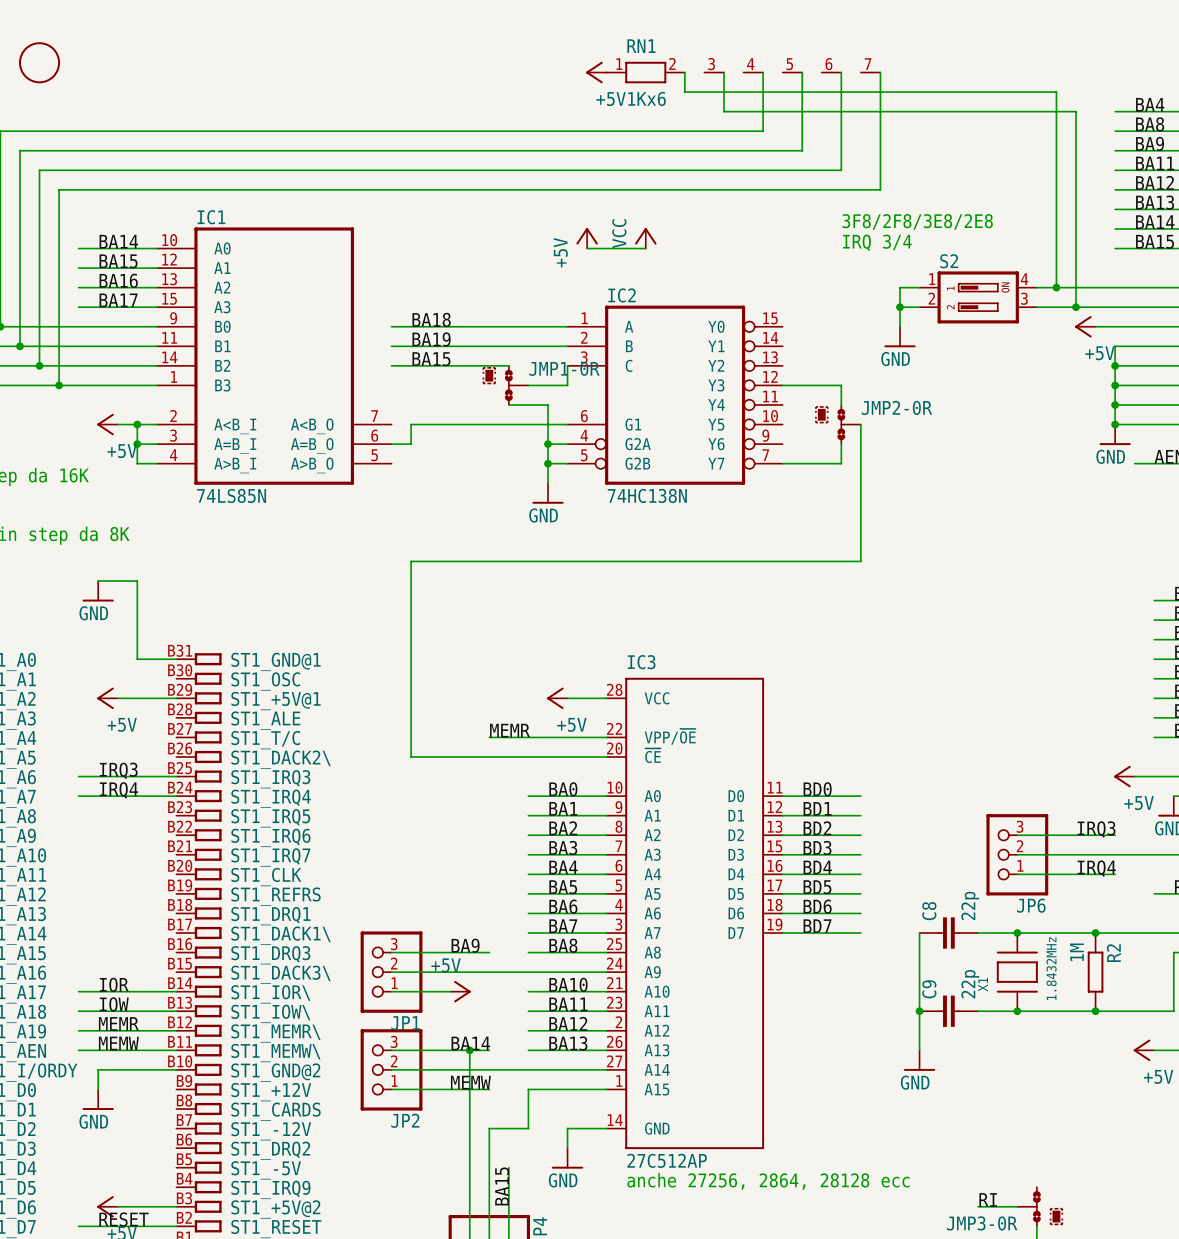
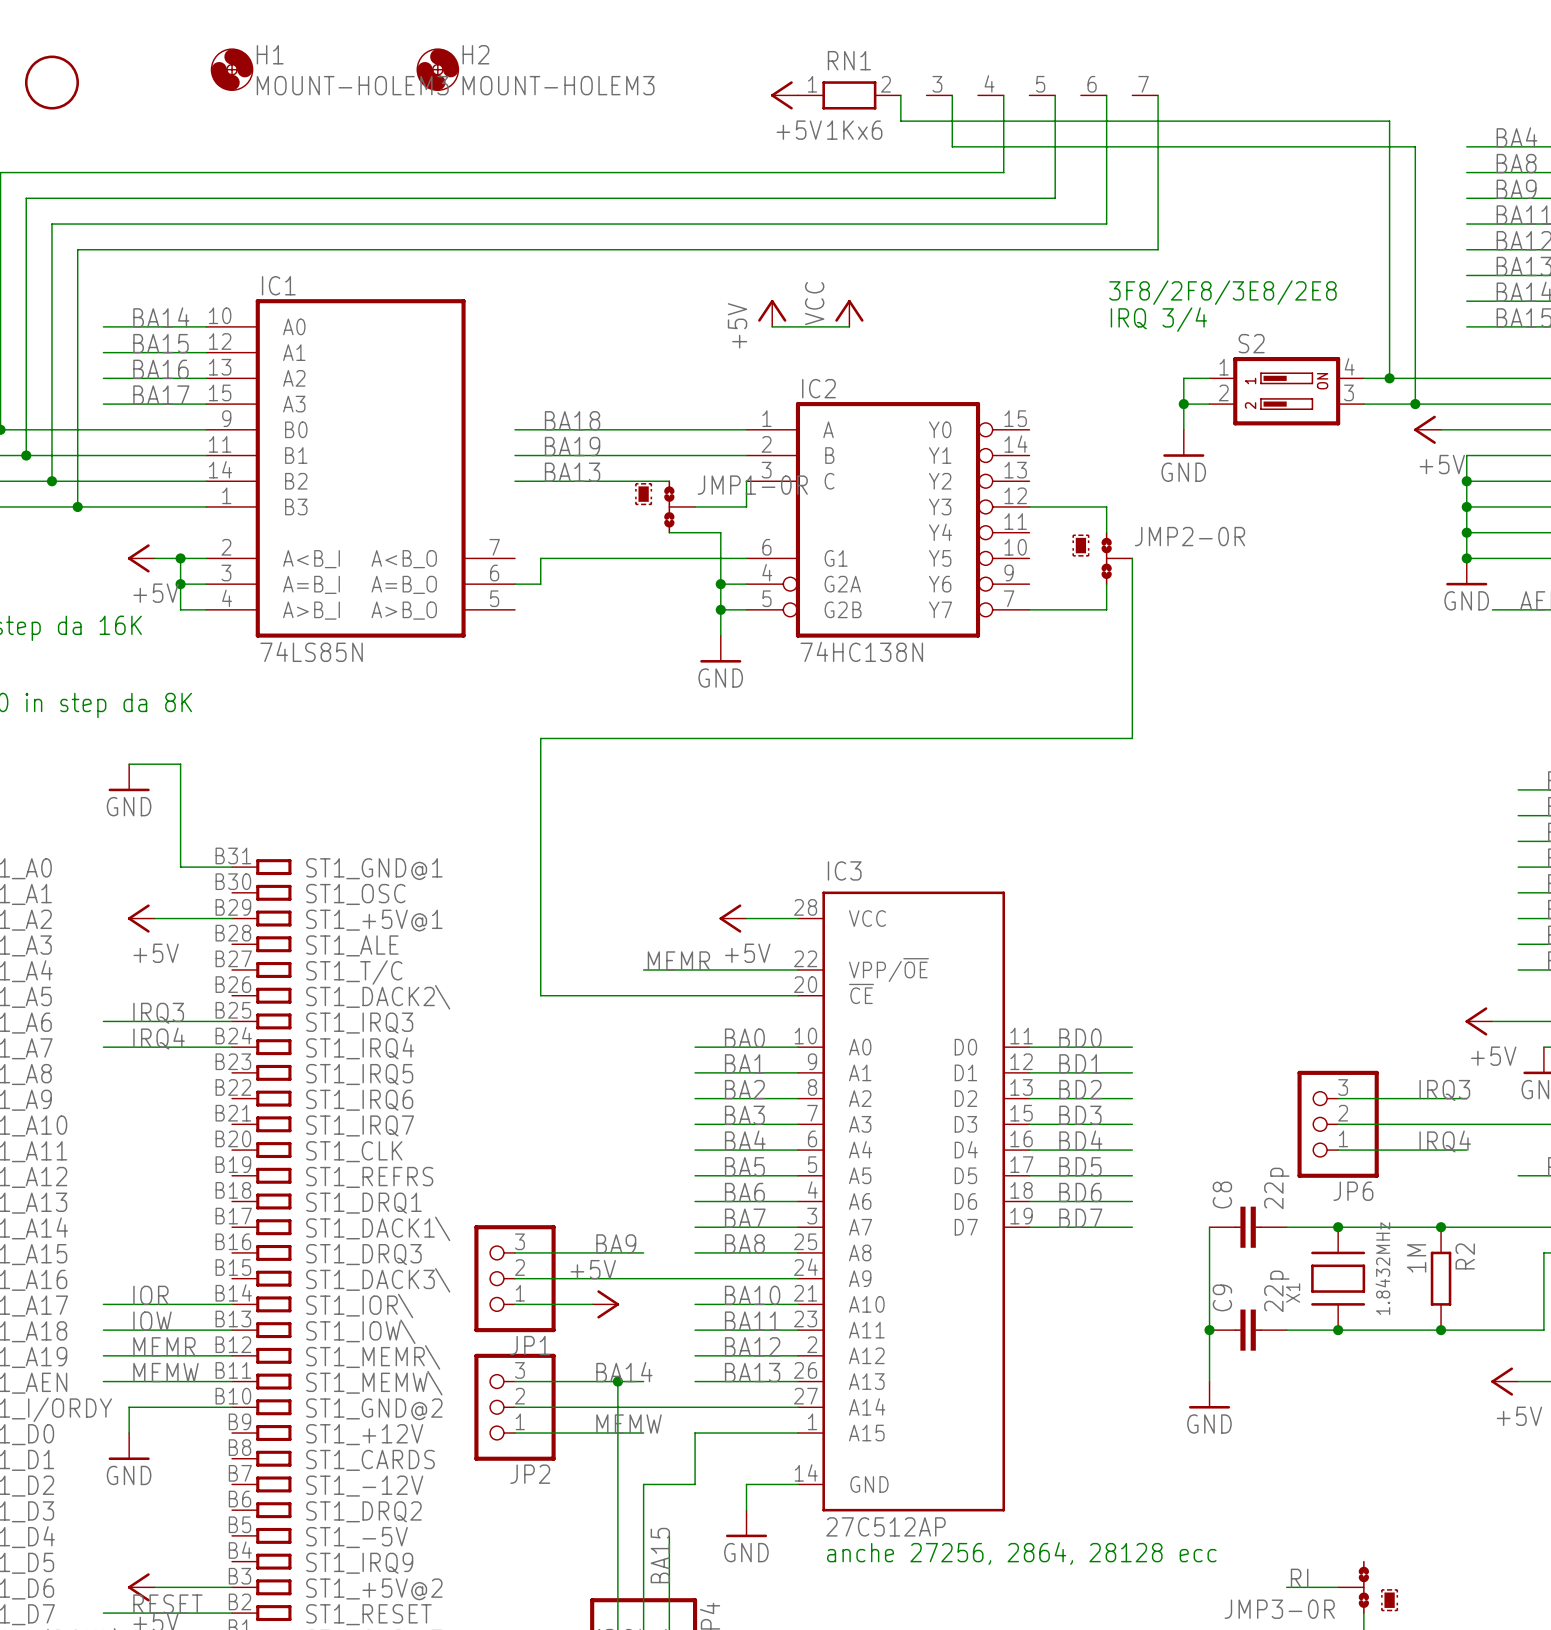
H1: none -> MOUNT-HOLEM3 (232, 69)
H2: none -> MOUNT-HOLEM3 (437, 69)
label: BA15 (431, 359) -> BA13 (572, 472)

